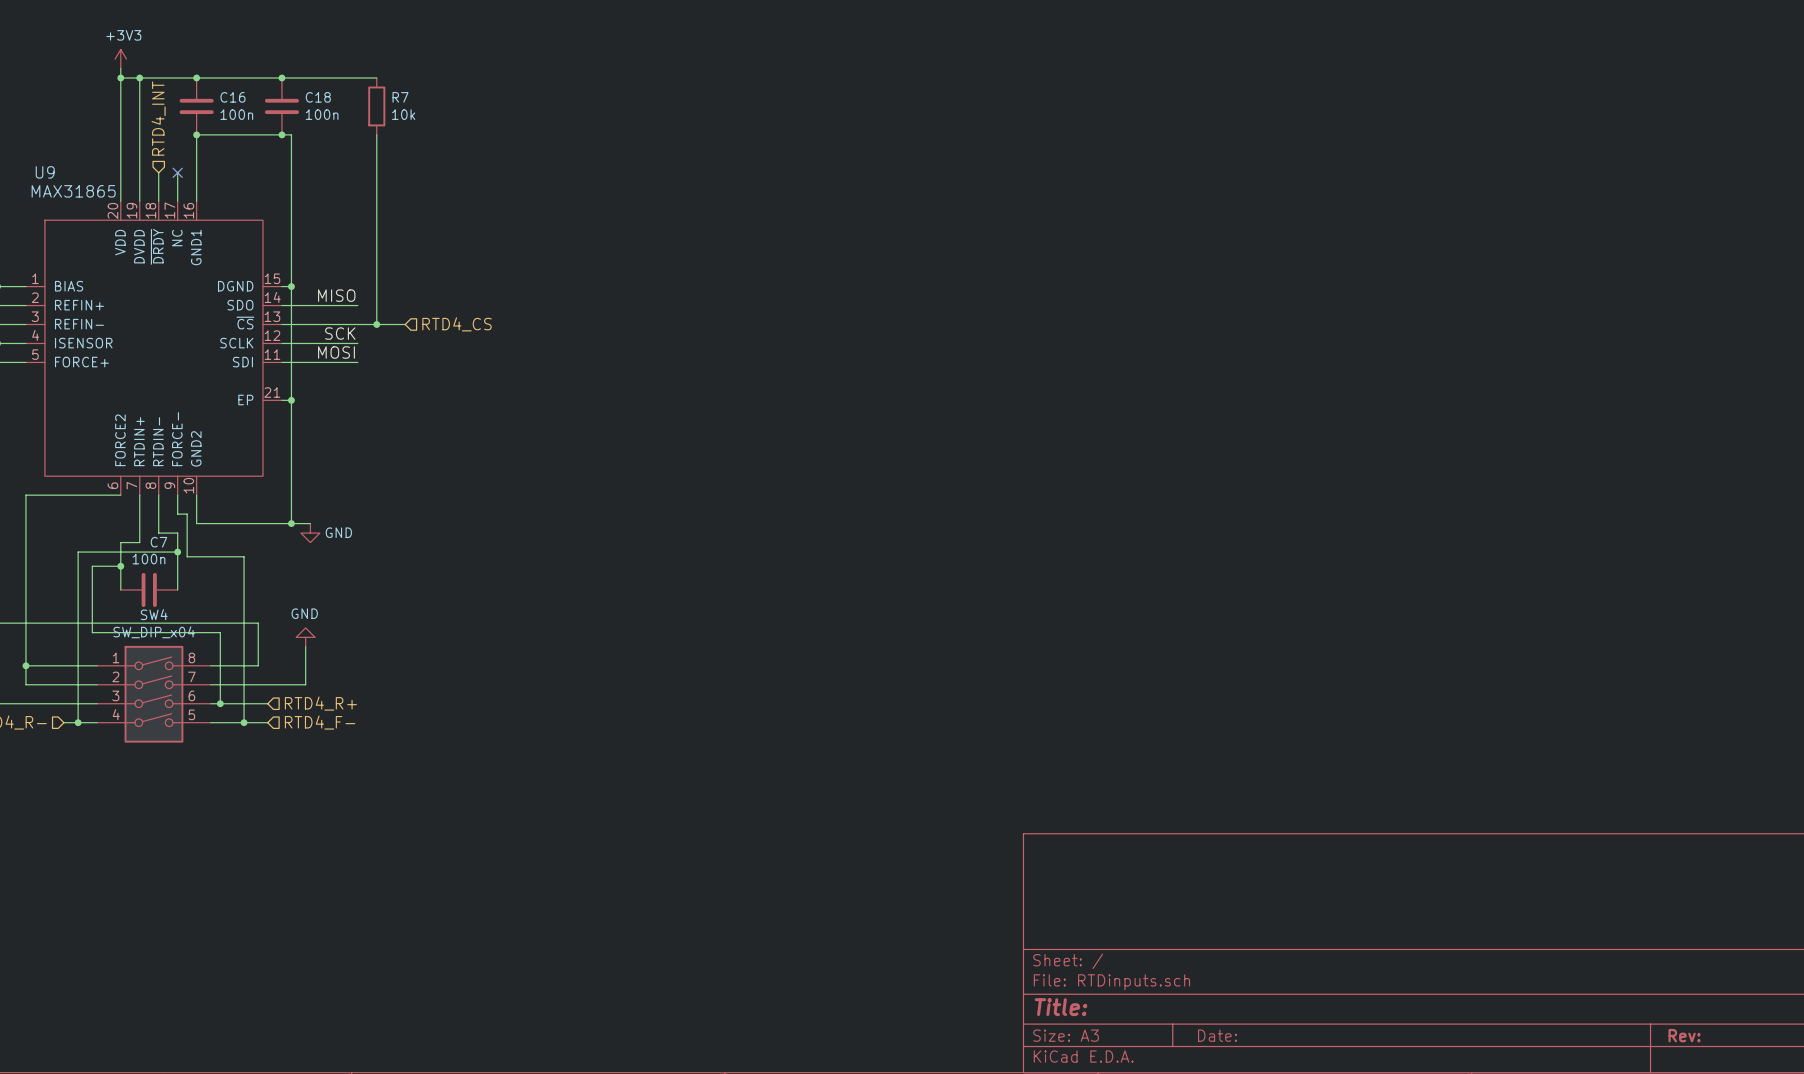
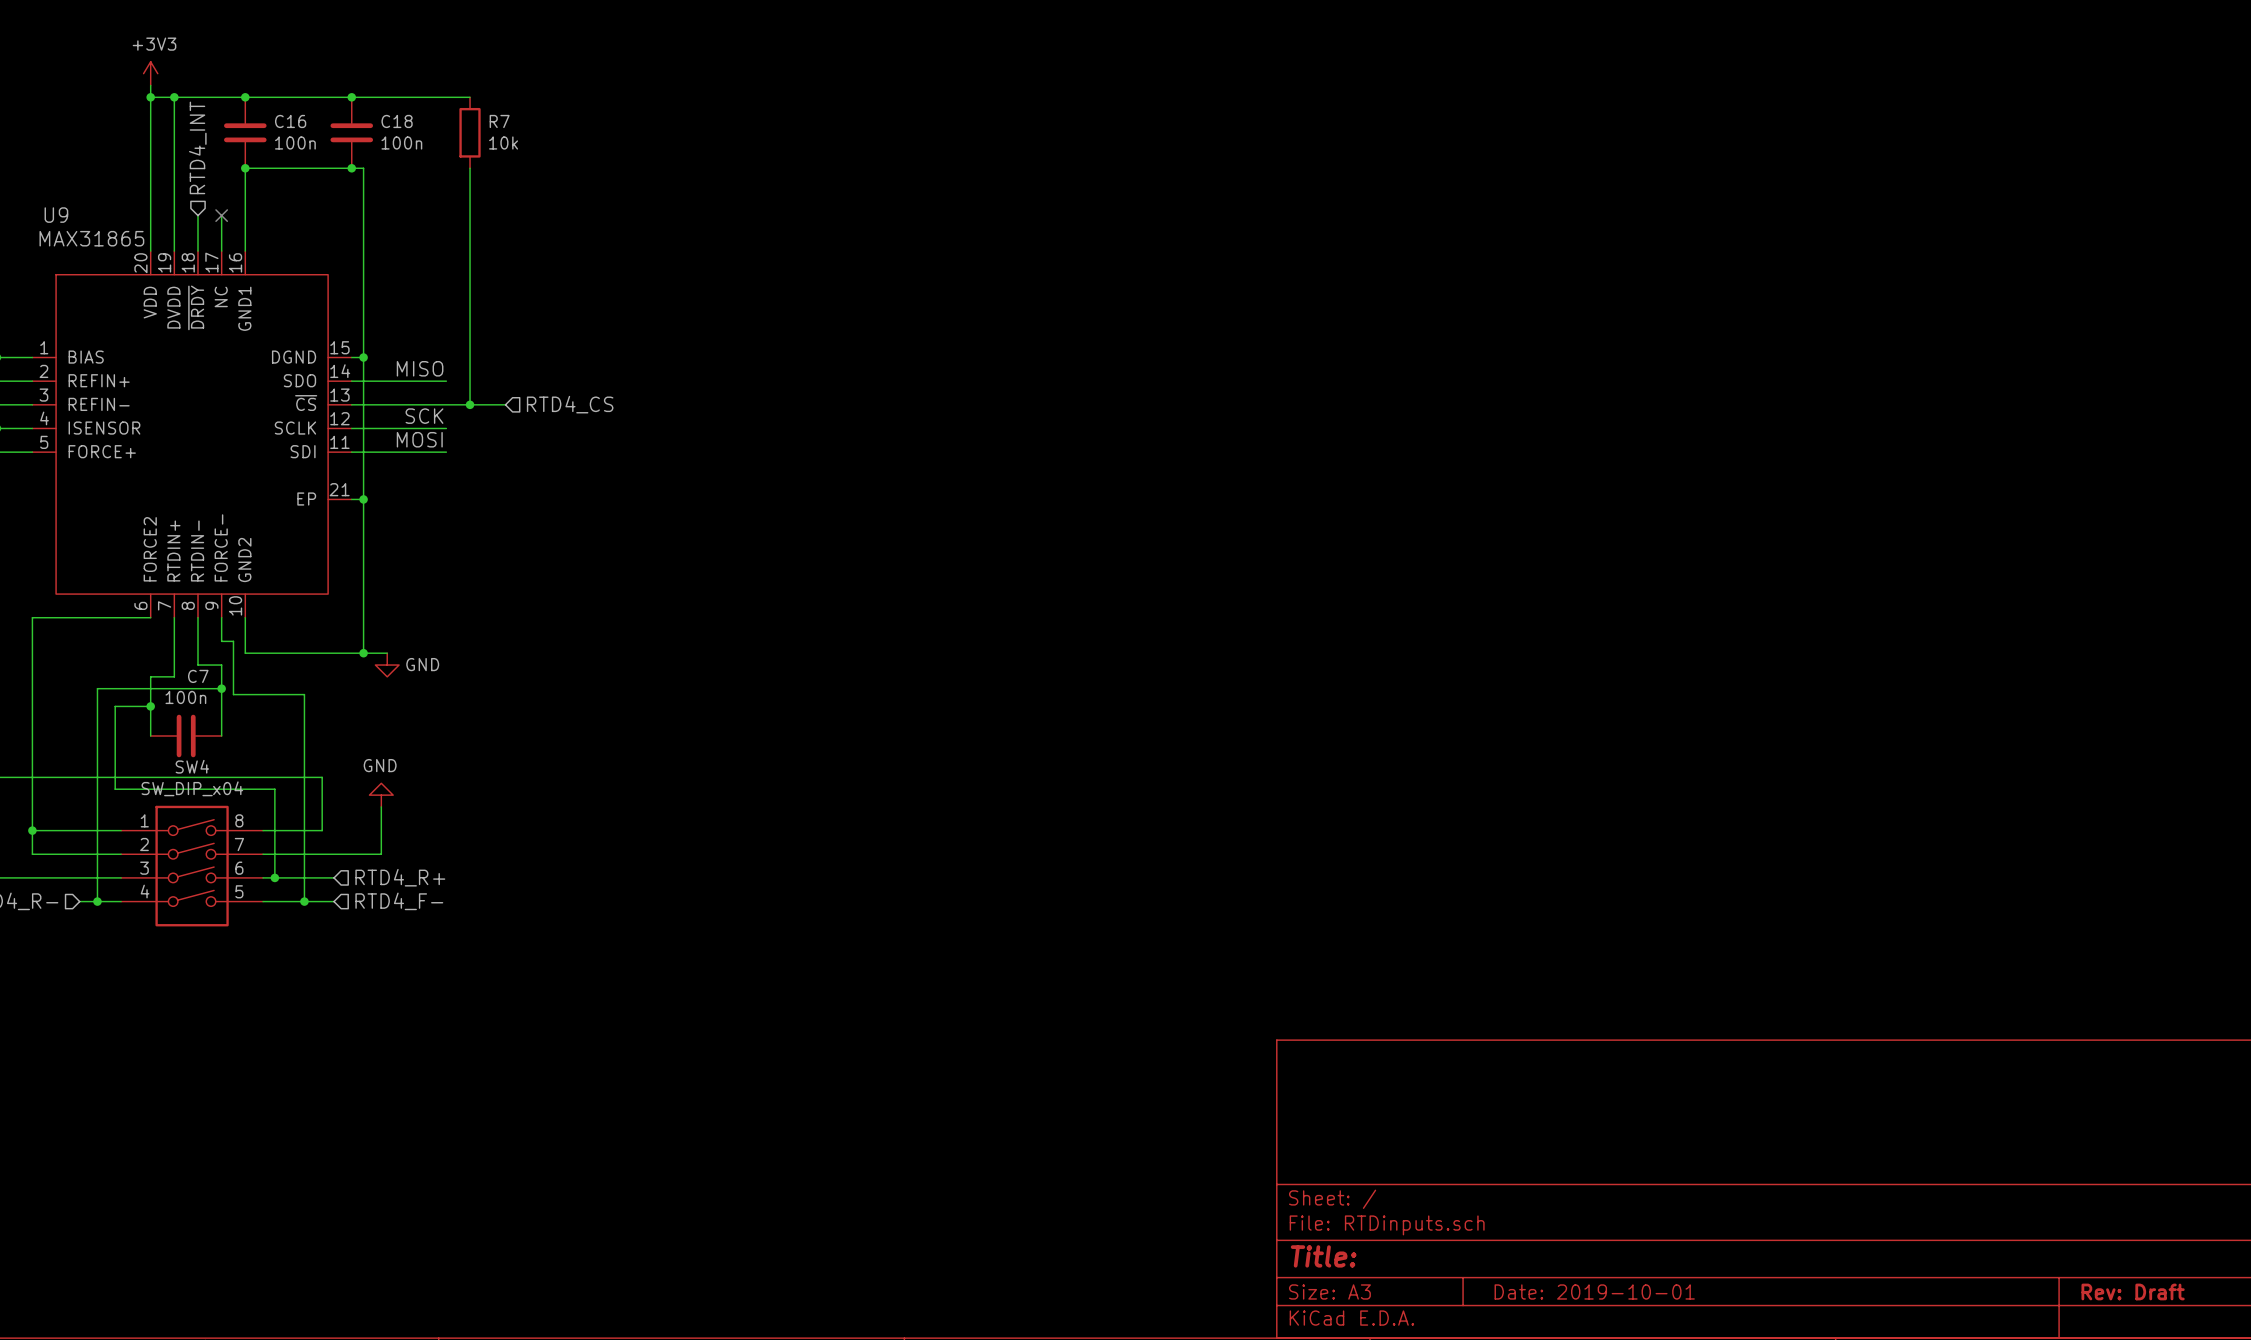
title block: Date: (1217, 1035) -> Date: 2019-10-01 (1594, 1291)
title block: Rev: (1684, 1035) -> Rev: Draft (2133, 1291)

